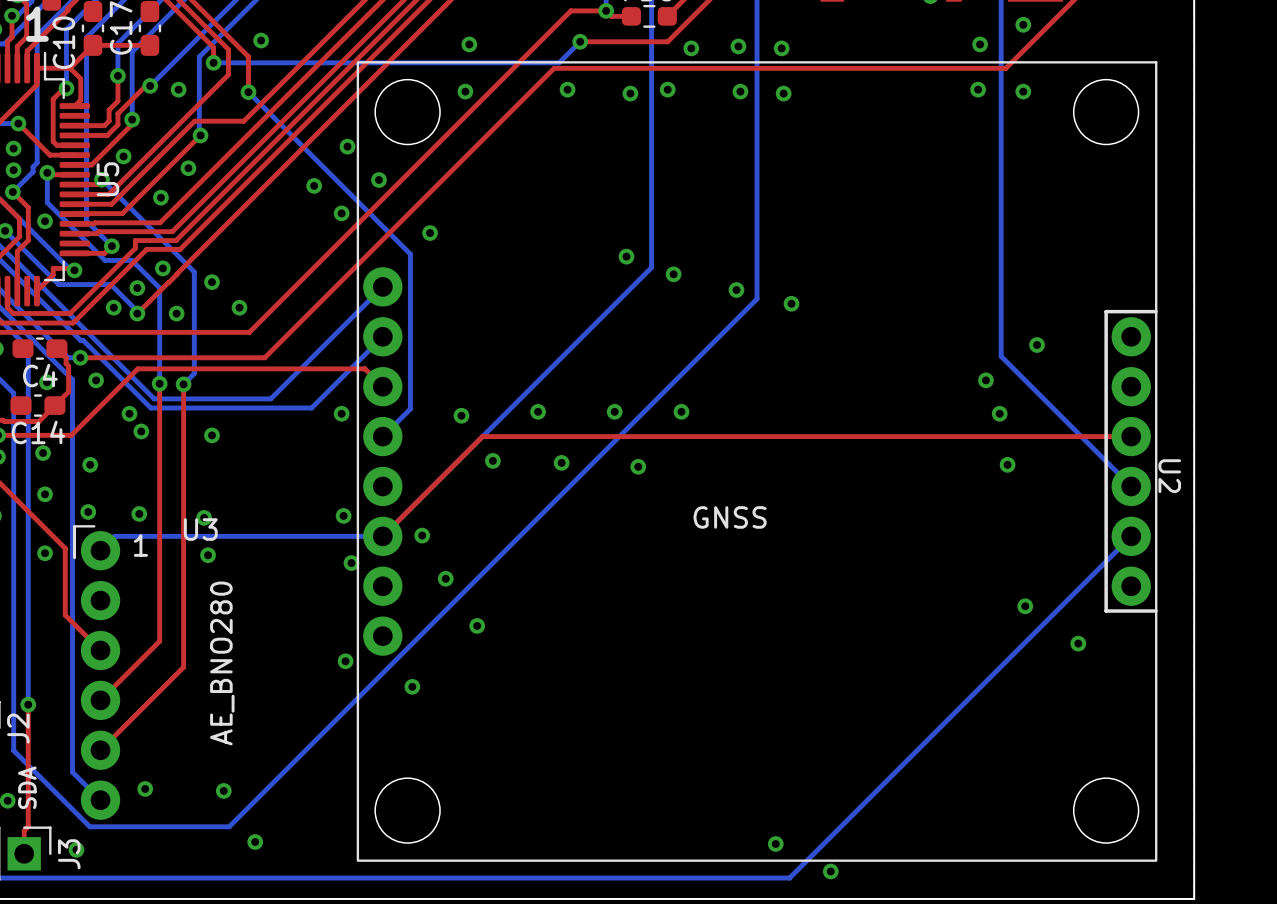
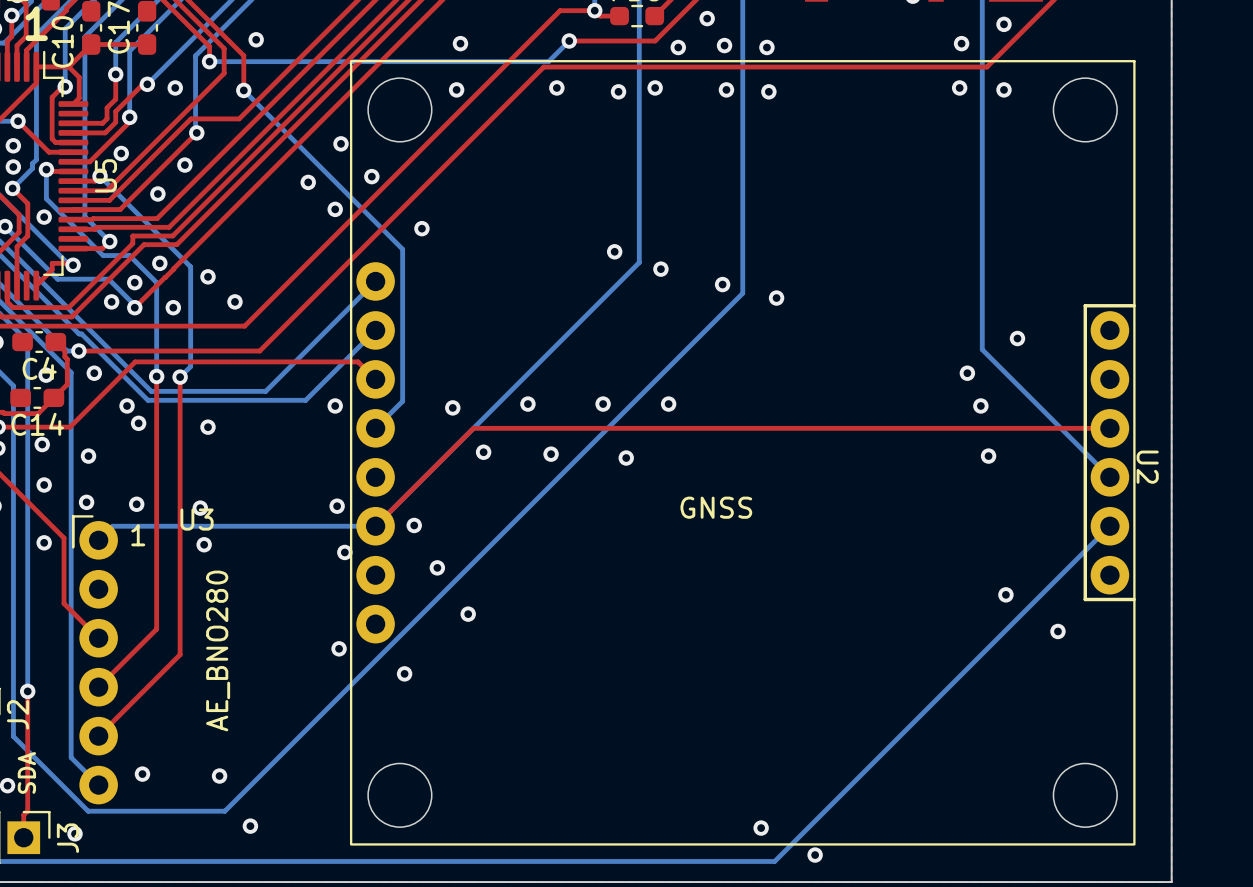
via: none -> (707, 18)

